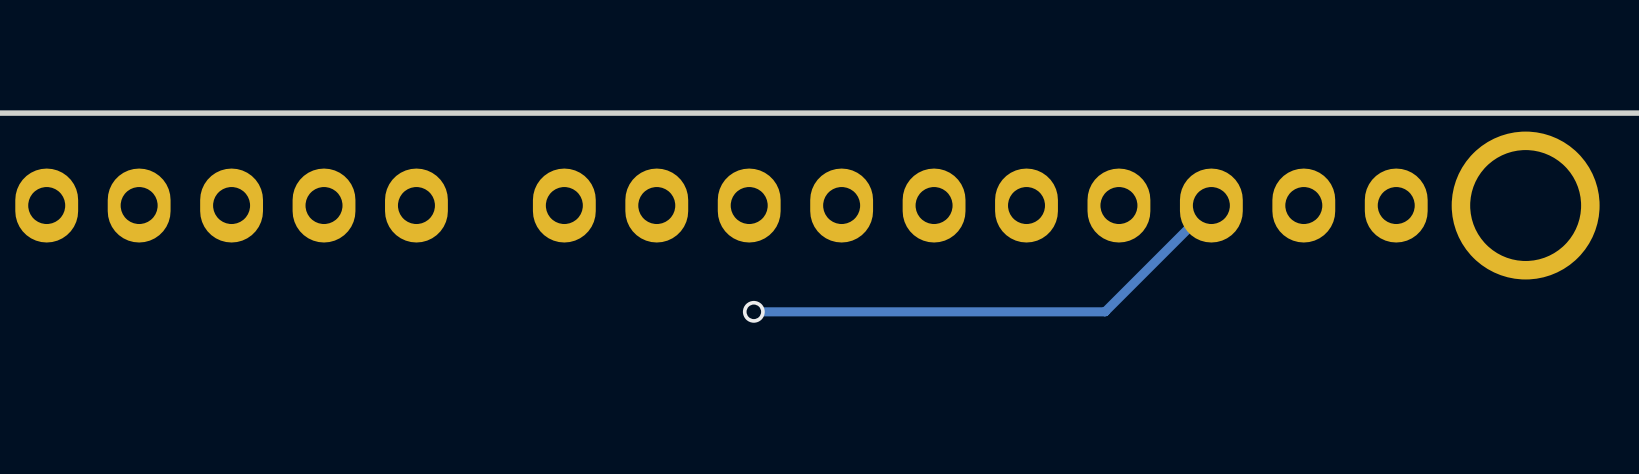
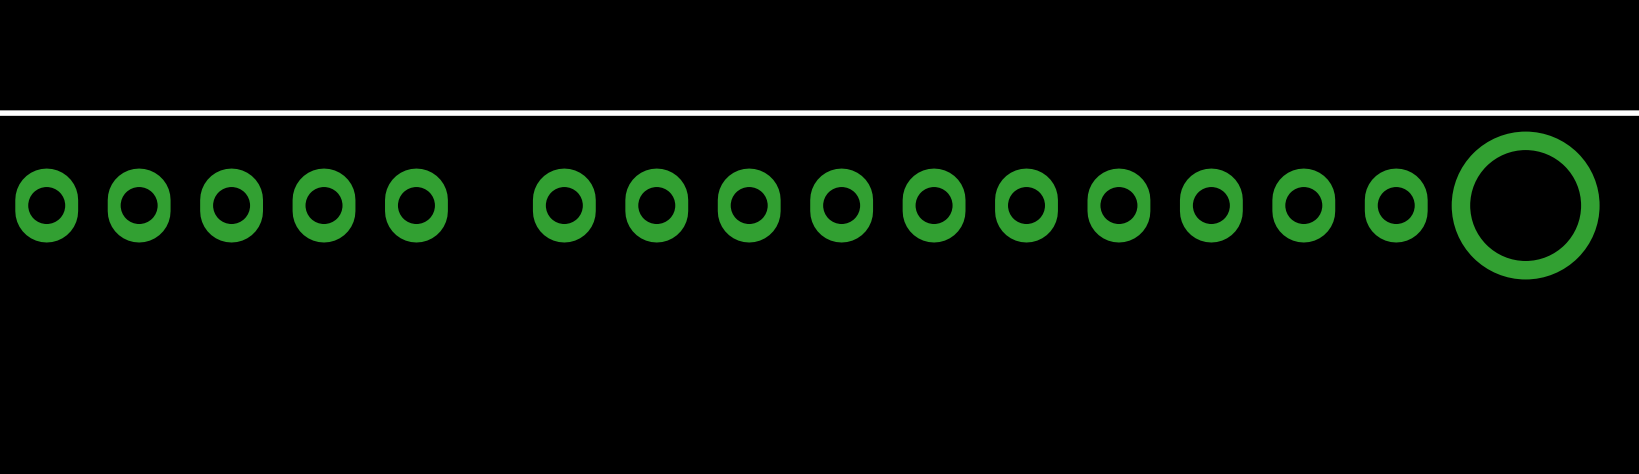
track: (1211, 205) (1105, 311) (753, 311) -> none
via: (753, 311) -> none

